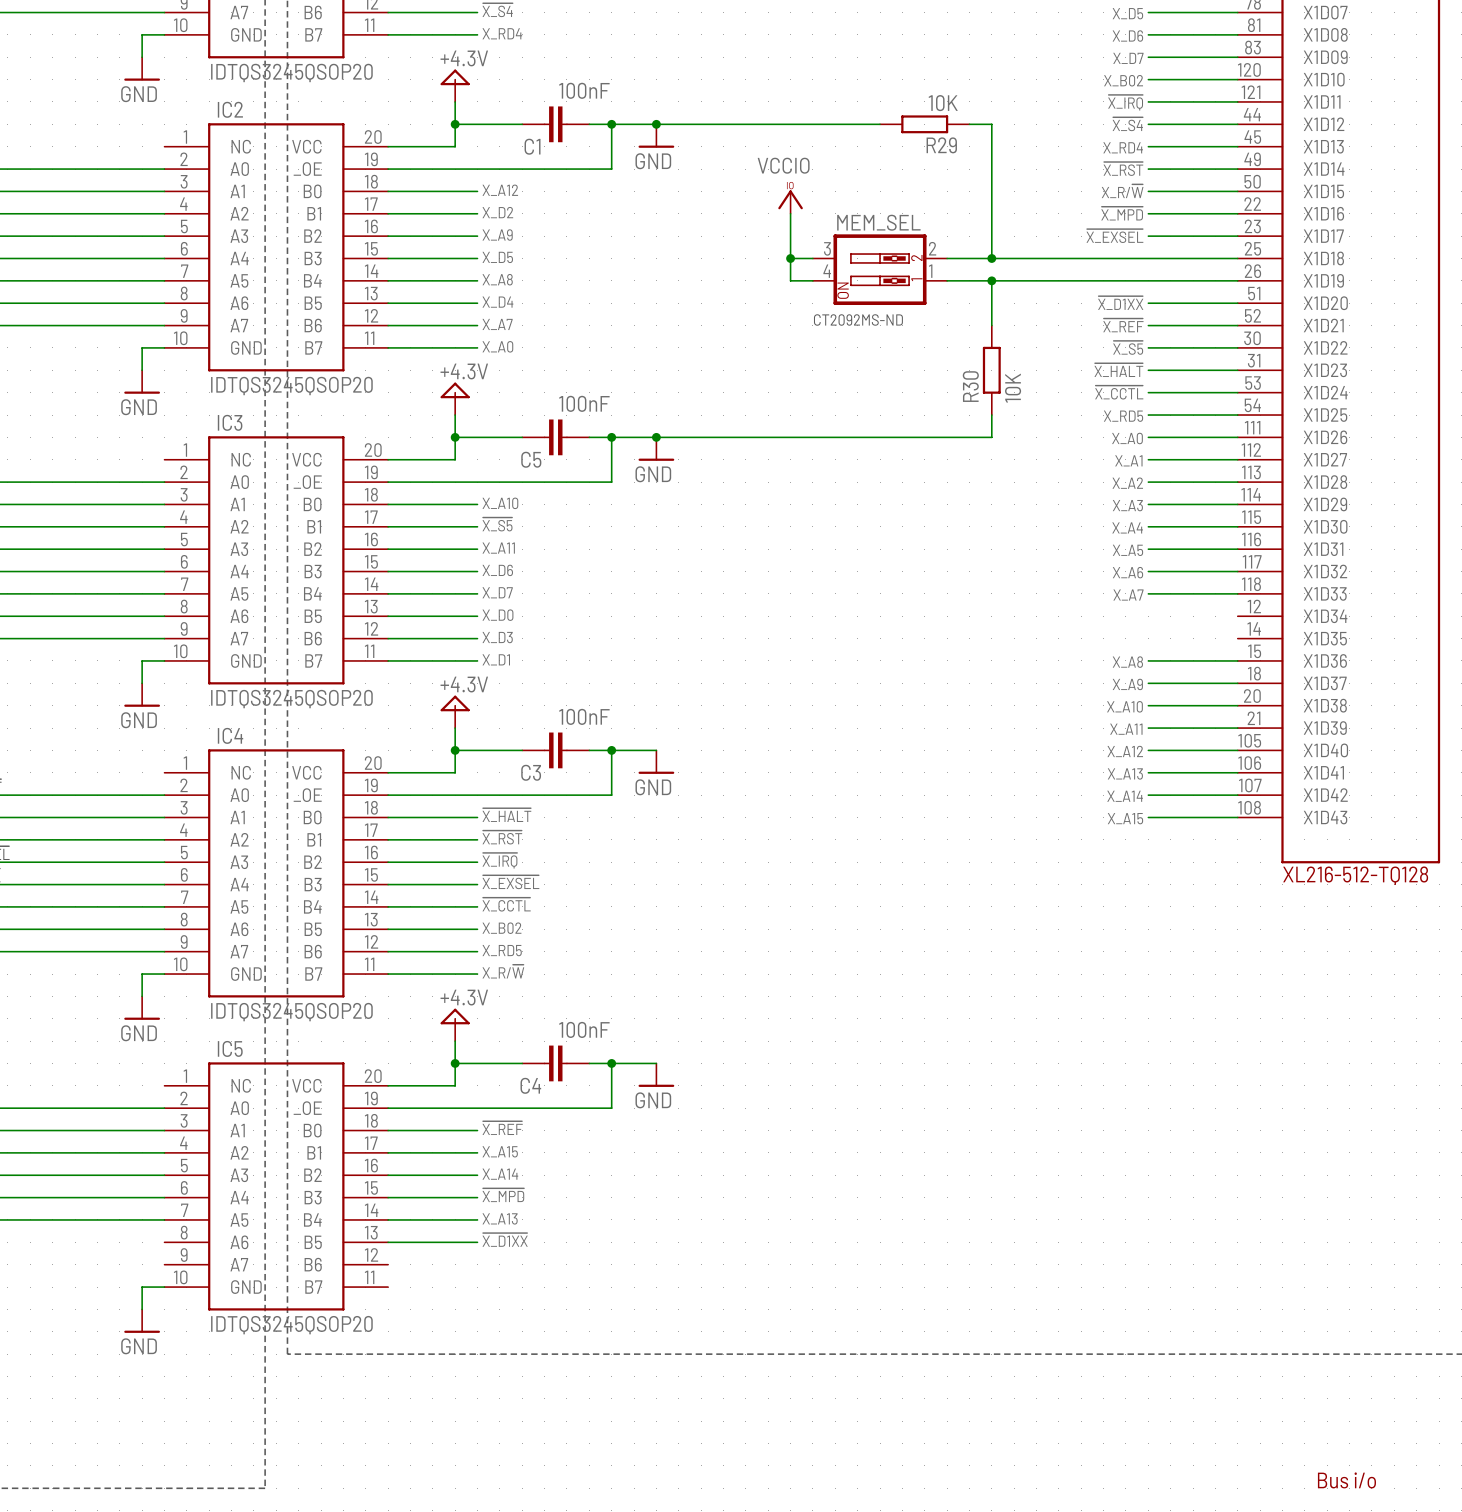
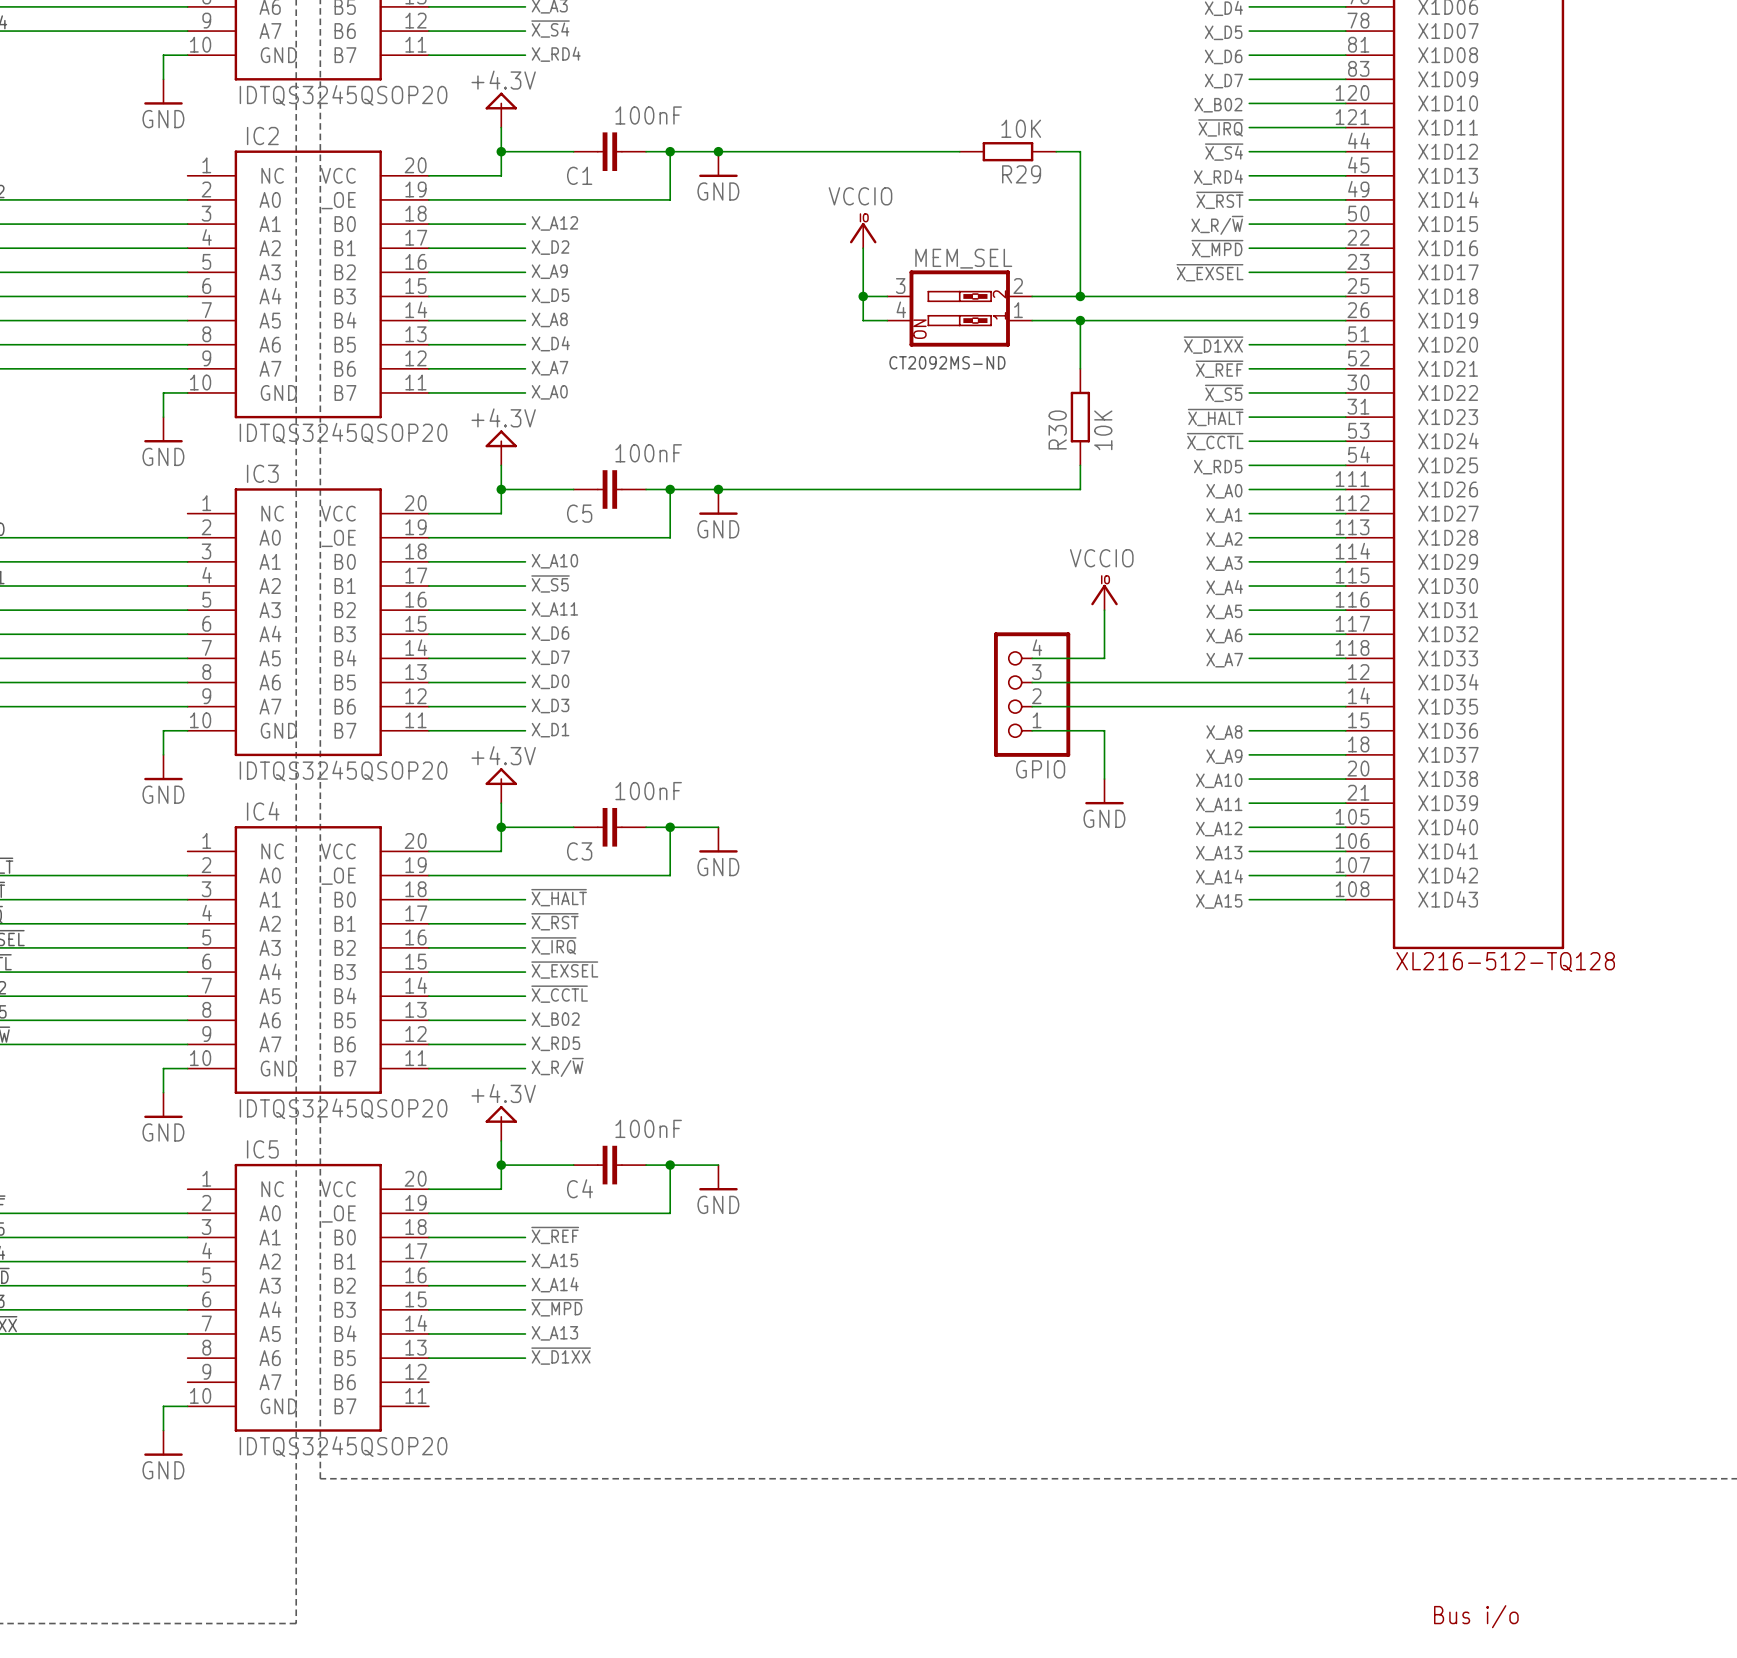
power symbol: none -> VCCIO (1104, 597)
wire: none -> (1104, 610) (1104, 658) (1032, 658)
wire: none -> (1032, 682) (1345, 682)
GPIO: none -> (1032, 694)
wire: none -> (1032, 706) (1345, 706)
wire: none -> (1032, 730) (1104, 730) (1104, 779)
power symbol: none -> GND (1104, 791)

